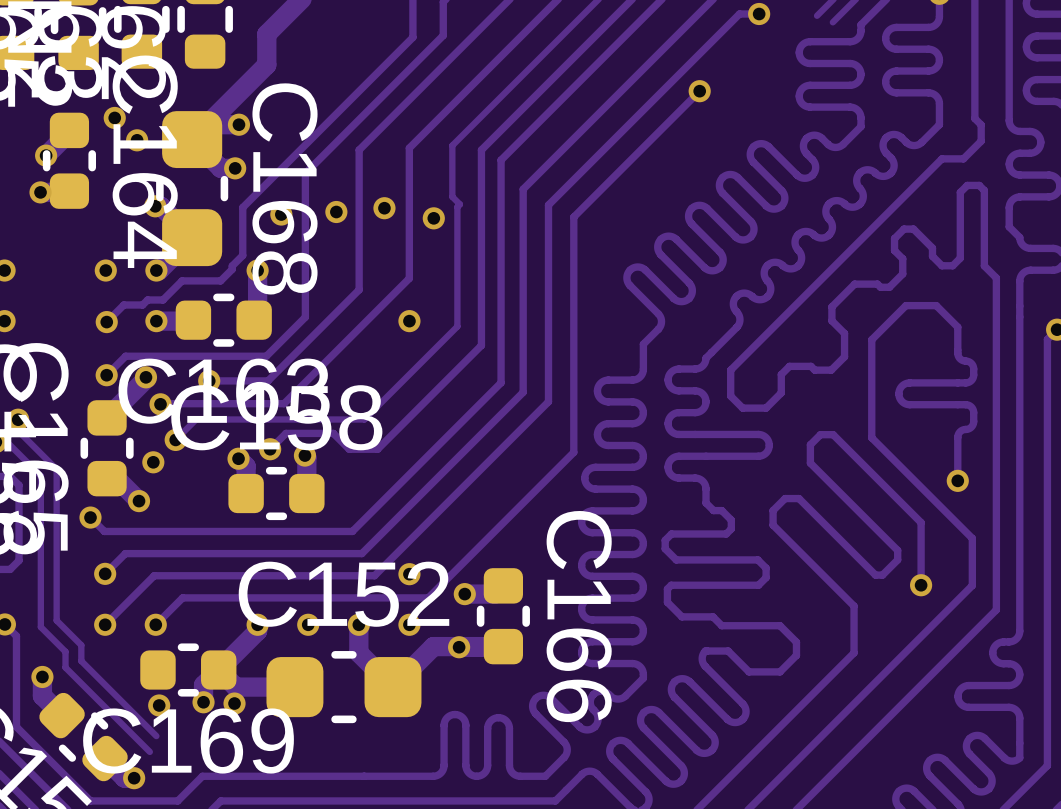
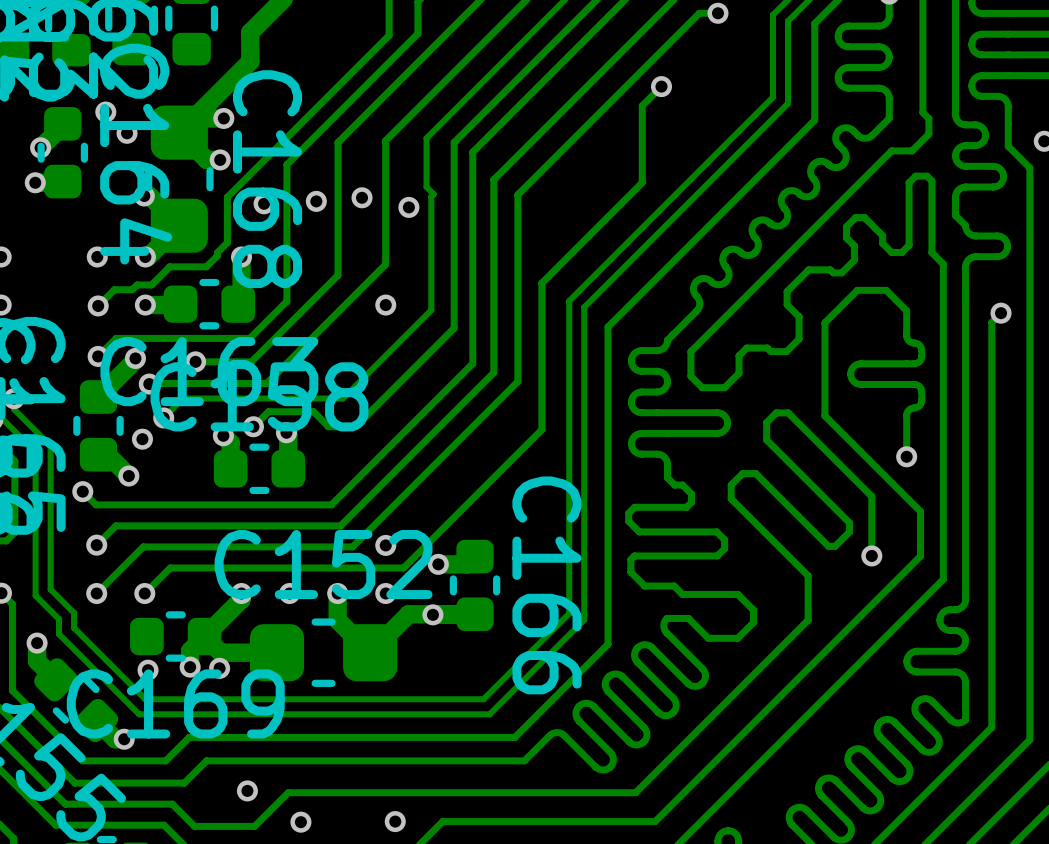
track: none -> (772, 14) (772, 97) (569, 301) (569, 613) (483, 699) (145, 699)
track: none -> (787, 21) (787, 103) (584, 307) (584, 619) (489, 714) (139, 714)
track: (861, 30) (858, 37) (852, 41) (805, 42) (800, 47) (799, 52) (801, 59) (807, 63) (851, 63) (857, 66) (860, 75) (855, 83) (807, 85) (801, 89) (799, 96) (801, 102) (807, 106) (854, 107) (859, 112) (861, 118) -> (814, 29) (814, 112)
track: (679, 111) (573, 217) (573, 298) -> (642, 105) (642, 182) (541, 283)
track: (843, 144) (833, 147) (817, 135) (807, 137) (804, 142) (803, 148) (814, 161) (815, 168) (811, 175) (804, 178) (798, 175) (766, 145) (759, 143) (753, 146) (750, 153) (751, 160) (782, 191) (784, 201) (778, 208) (770, 208) (736, 176) (729, 174) (722, 177) (719, 184) (721, 191) (753, 224) (752, 234) (744, 239) (736, 237) (705, 206) (698, 205) (691, 208) (688, 215) (690, 222) (722, 255) (722, 264) (717, 269) (711, 270) (705, 268) (673, 237) (667, 236) (660, 239) (657, 245) (659, 252) (690, 284) (692, 290) (687, 299) (677, 301) (643, 268) (636, 267) (629, 271) (626, 277) (628, 283) (660, 316) (661, 322) (658, 329) -> (797, 137) (622, 312)
track: (643, 369) (641, 375) (635, 379) (604, 380) (598, 385) (597, 390) (599, 397) (604, 401) (633, 401) (641, 407) (643, 415) (637, 422) (605, 424) (599, 427) (597, 434) (599, 441) (605, 445) (637, 446) (643, 453) (641, 461) (633, 467) (592, 467) (587, 471) (584, 478) (587, 484) (592, 488) (636, 489) (642, 495) (642, 504) (633, 510) (589, 511) (583, 515) (581, 521) (583, 528) (589, 532) (633, 532) (641, 538) (643, 546) (636, 553) (589, 554) (583, 558) (581, 565) (583, 572) (589, 575) (636, 577) (643, 584) (641, 593) (633, 598) (589, 598) (583, 602) (581, 609) (583, 615) (589, 619) (636, 620) (642, 626) (643, 633) (639, 639) (633, 641) (589, 642) (583, 646) (581, 652) (583, 659) (589, 663) (636, 664) (641, 668) (643, 674) -> (608, 350) (608, 640)
track: (625, 695) (616, 699) (603, 691) (594, 693) (590, 703) (597, 714) (598, 720) (593, 727) (587, 729) (580, 727) (549, 696) (542, 695) (535, 698) (532, 703) (533, 710) (565, 744) (567, 751) (564, 757) -> (591, 661) (532, 719)
track: (520, 776) (513, 774) (509, 768) (508, 724) (504, 719) (498, 717) (491, 719) (488, 725) (486, 770) (478, 776) (469, 773) (465, 766) (465, 722) (461, 716) (454, 714) (448, 716) (444, 722) (443, 769) (438, 774) (433, 776) -> (491, 737) (408, 737)

